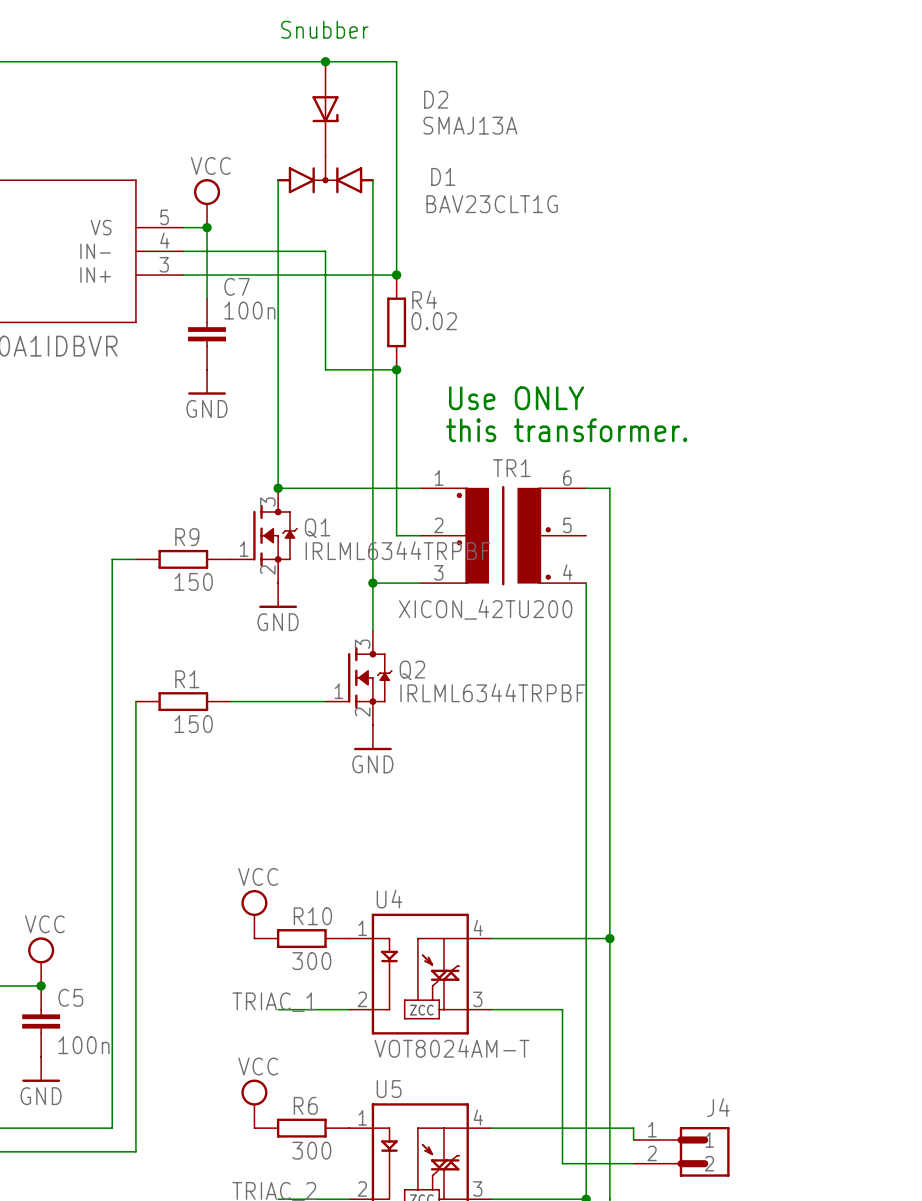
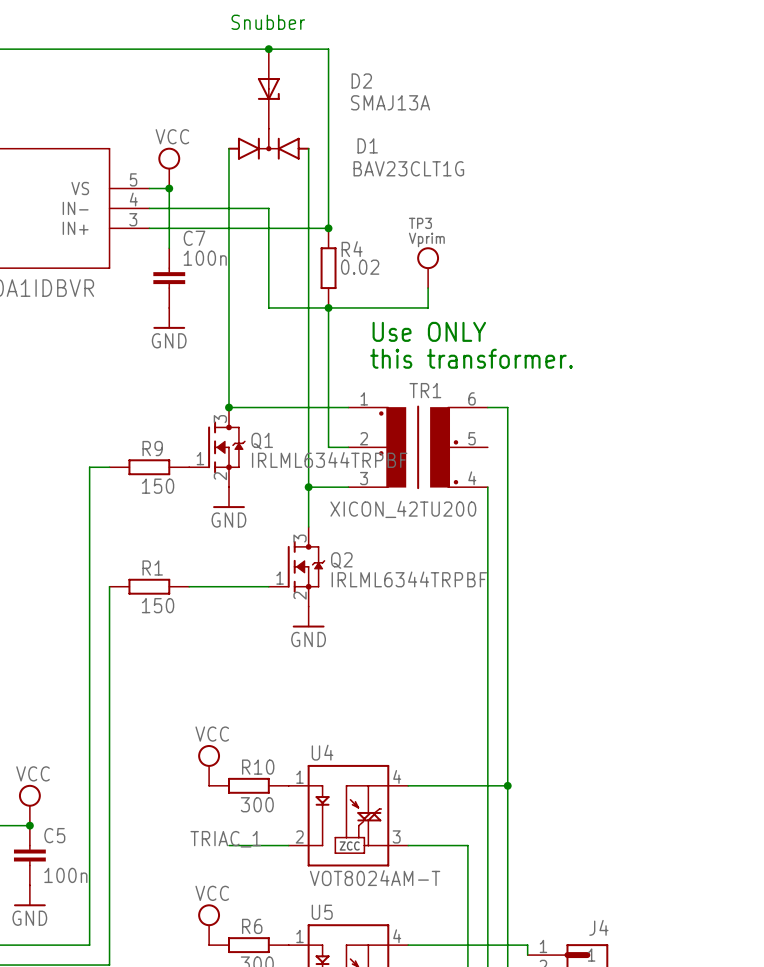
TP3: none -> Vprim (428, 267)
wire: none -> (428, 288) (428, 307) (328, 307)

